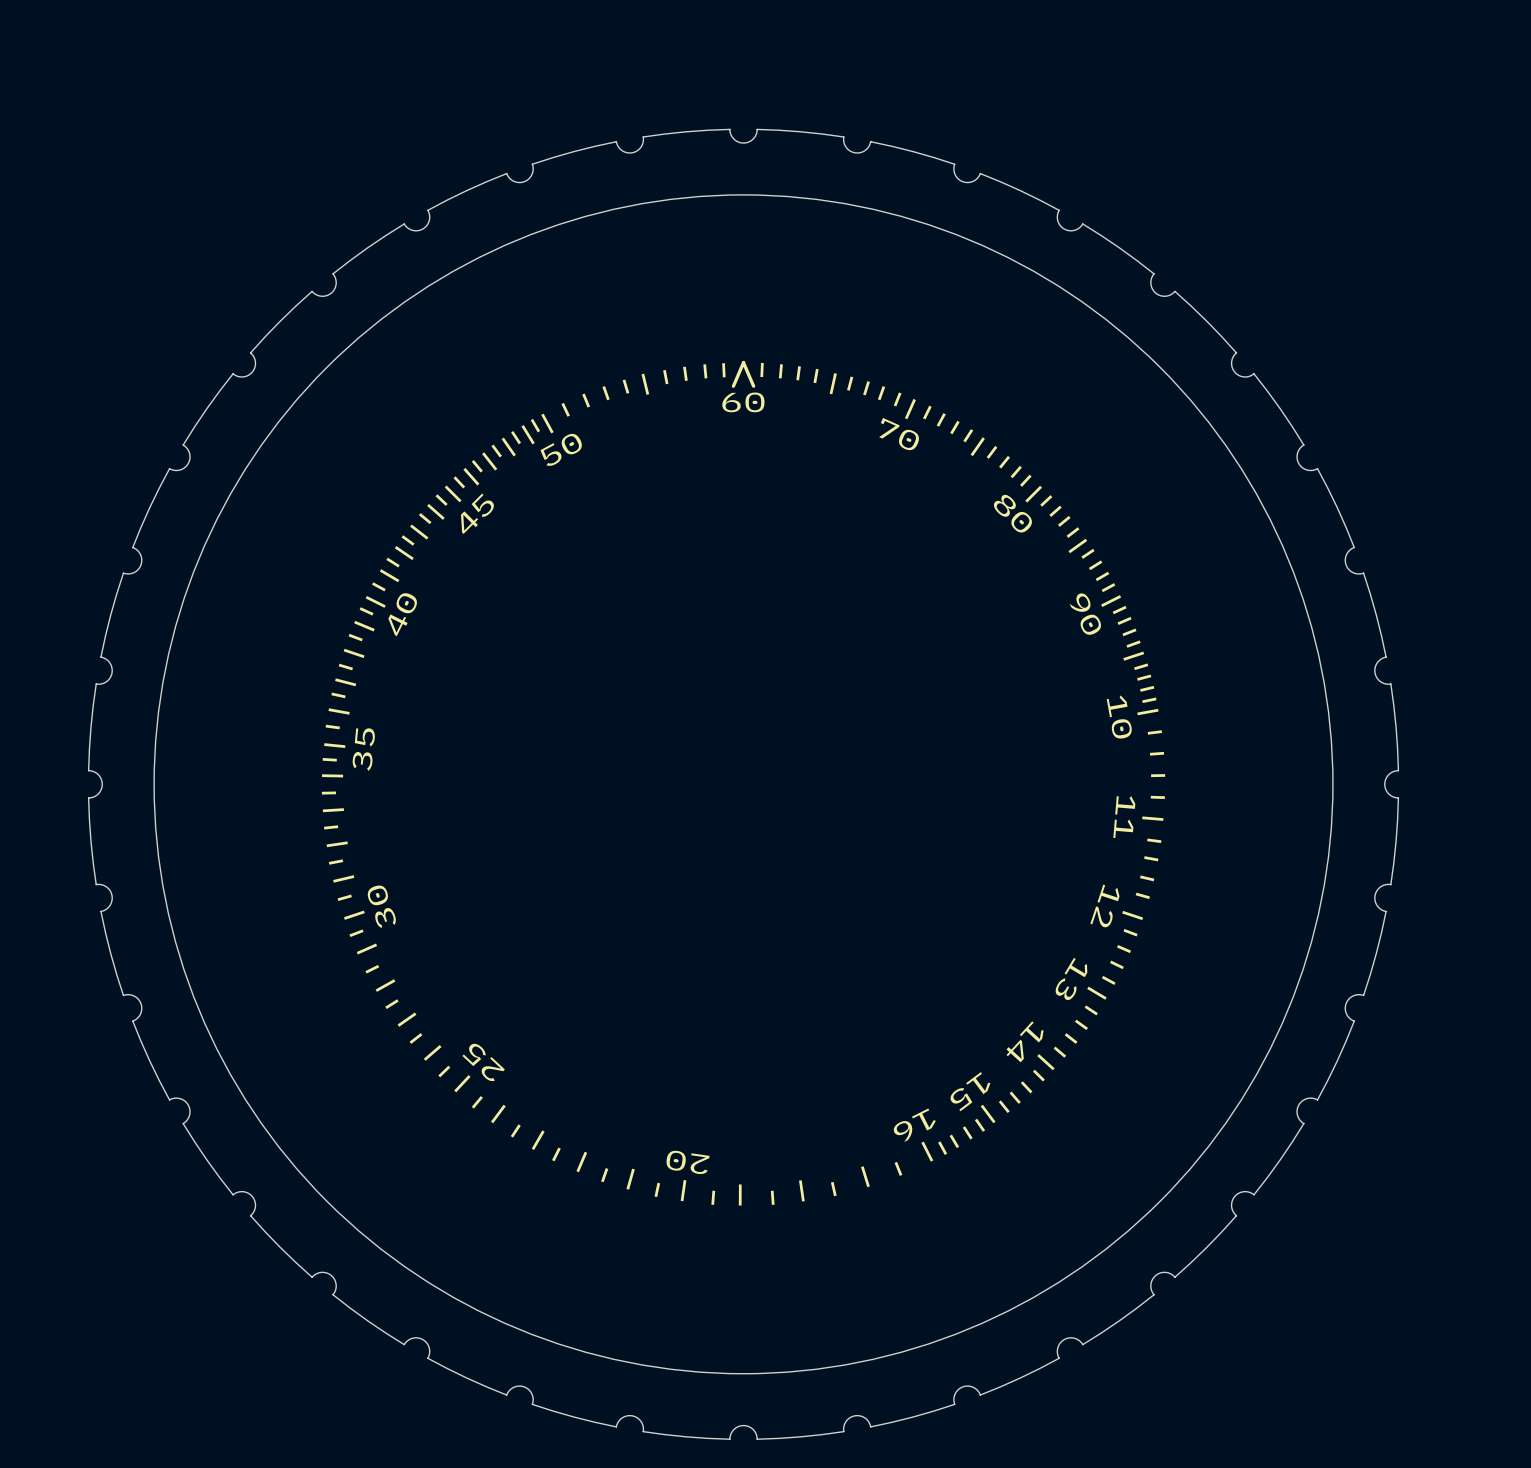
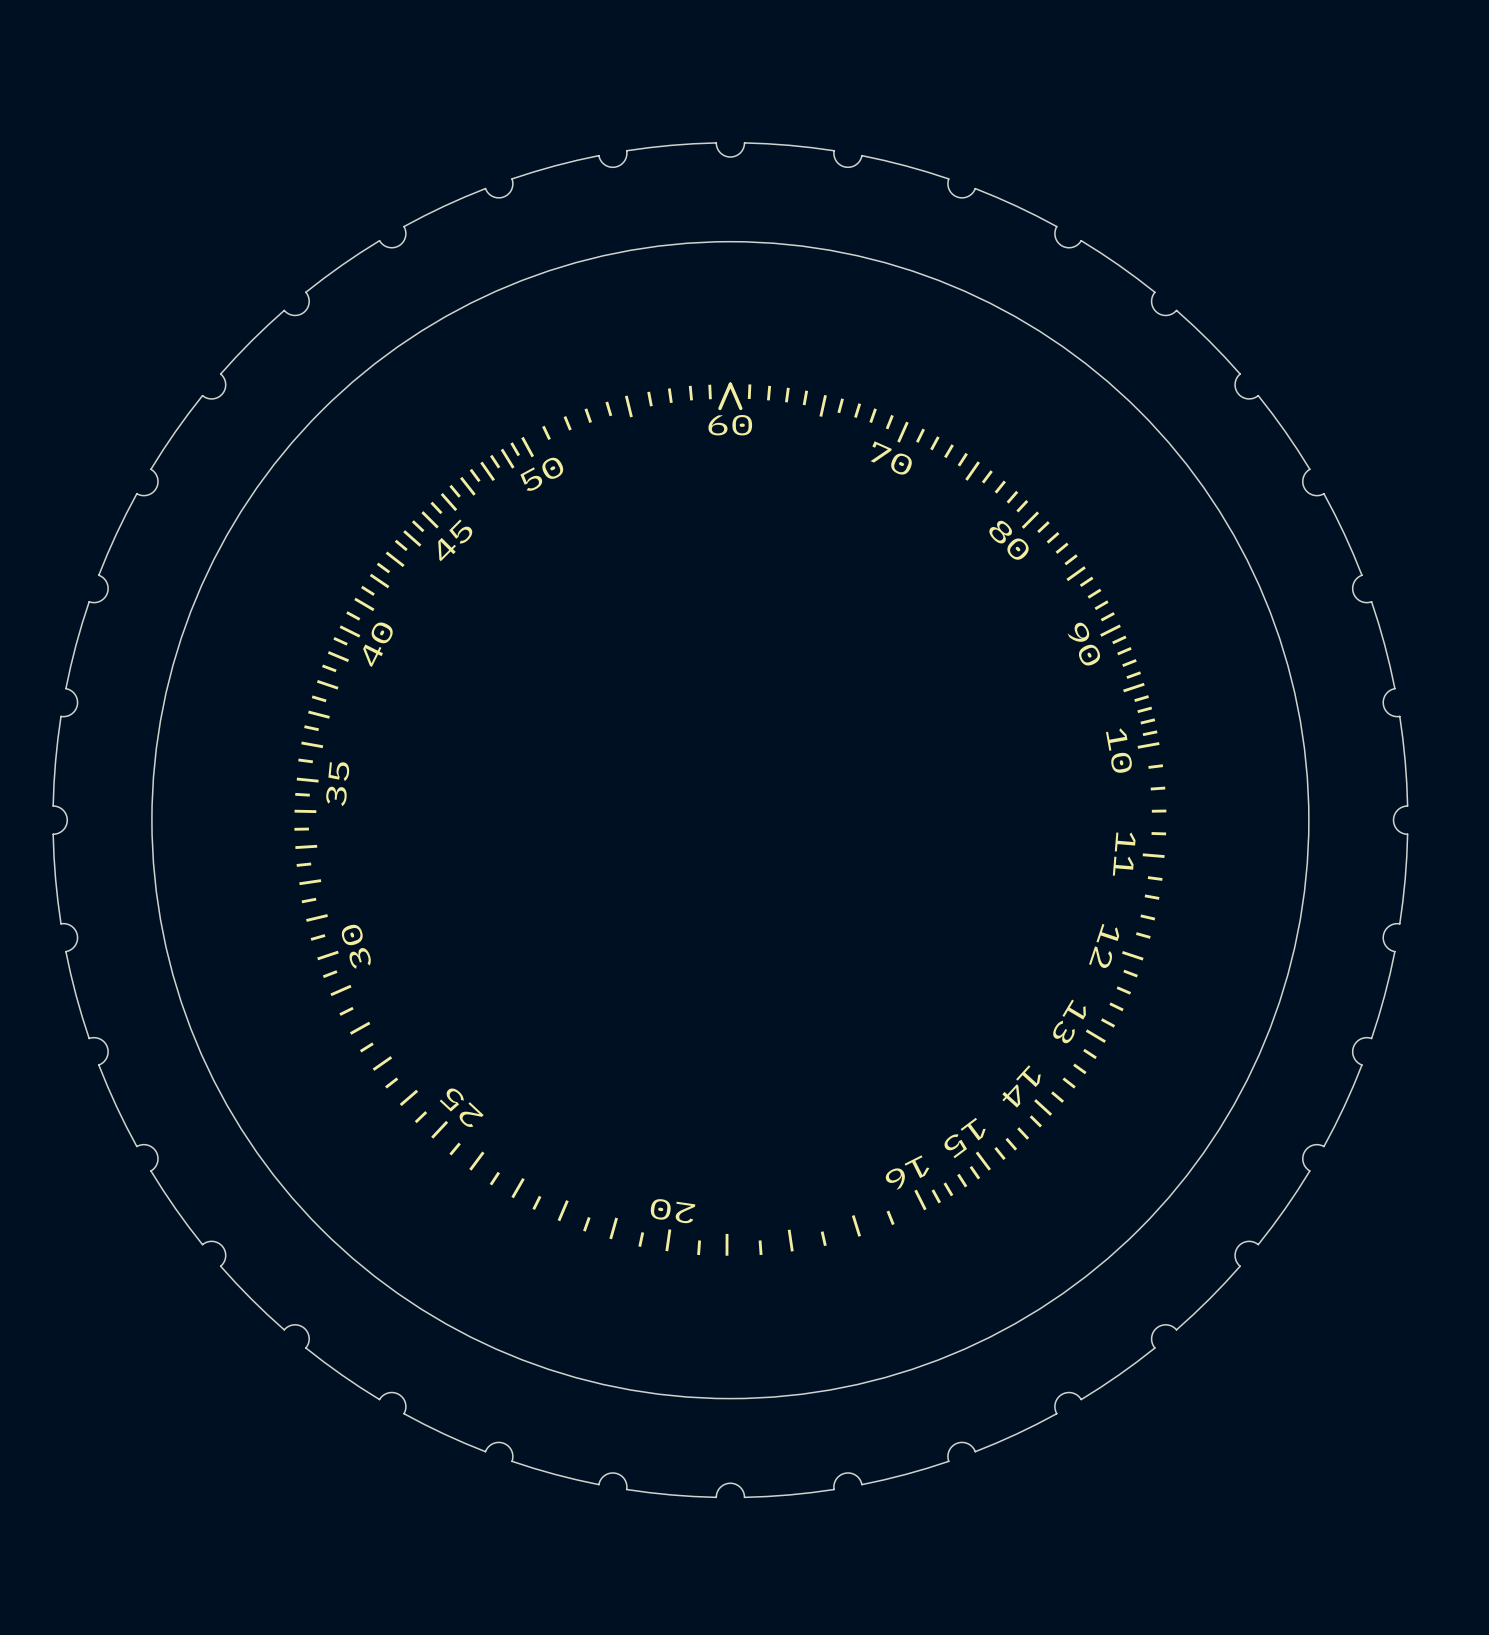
round board edge size: [153, 194, 1334, 1375] -> [151, 240, 1310, 1400]

